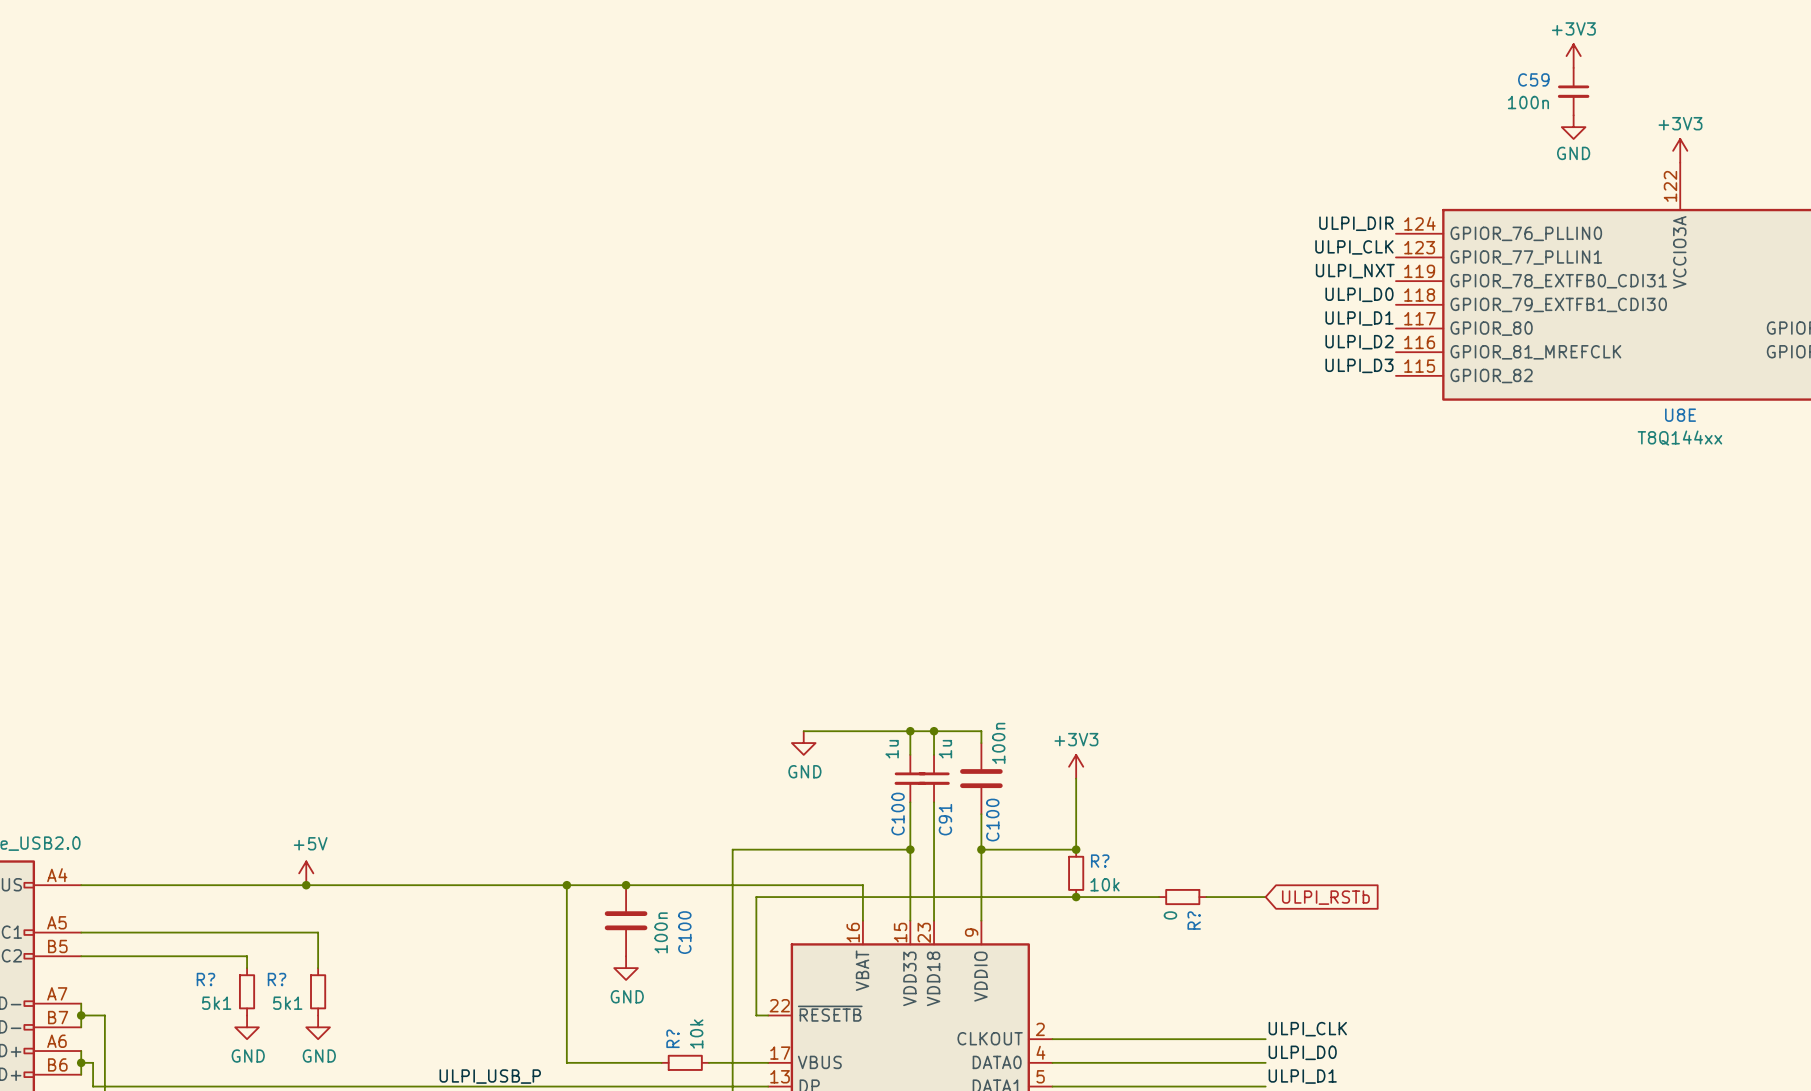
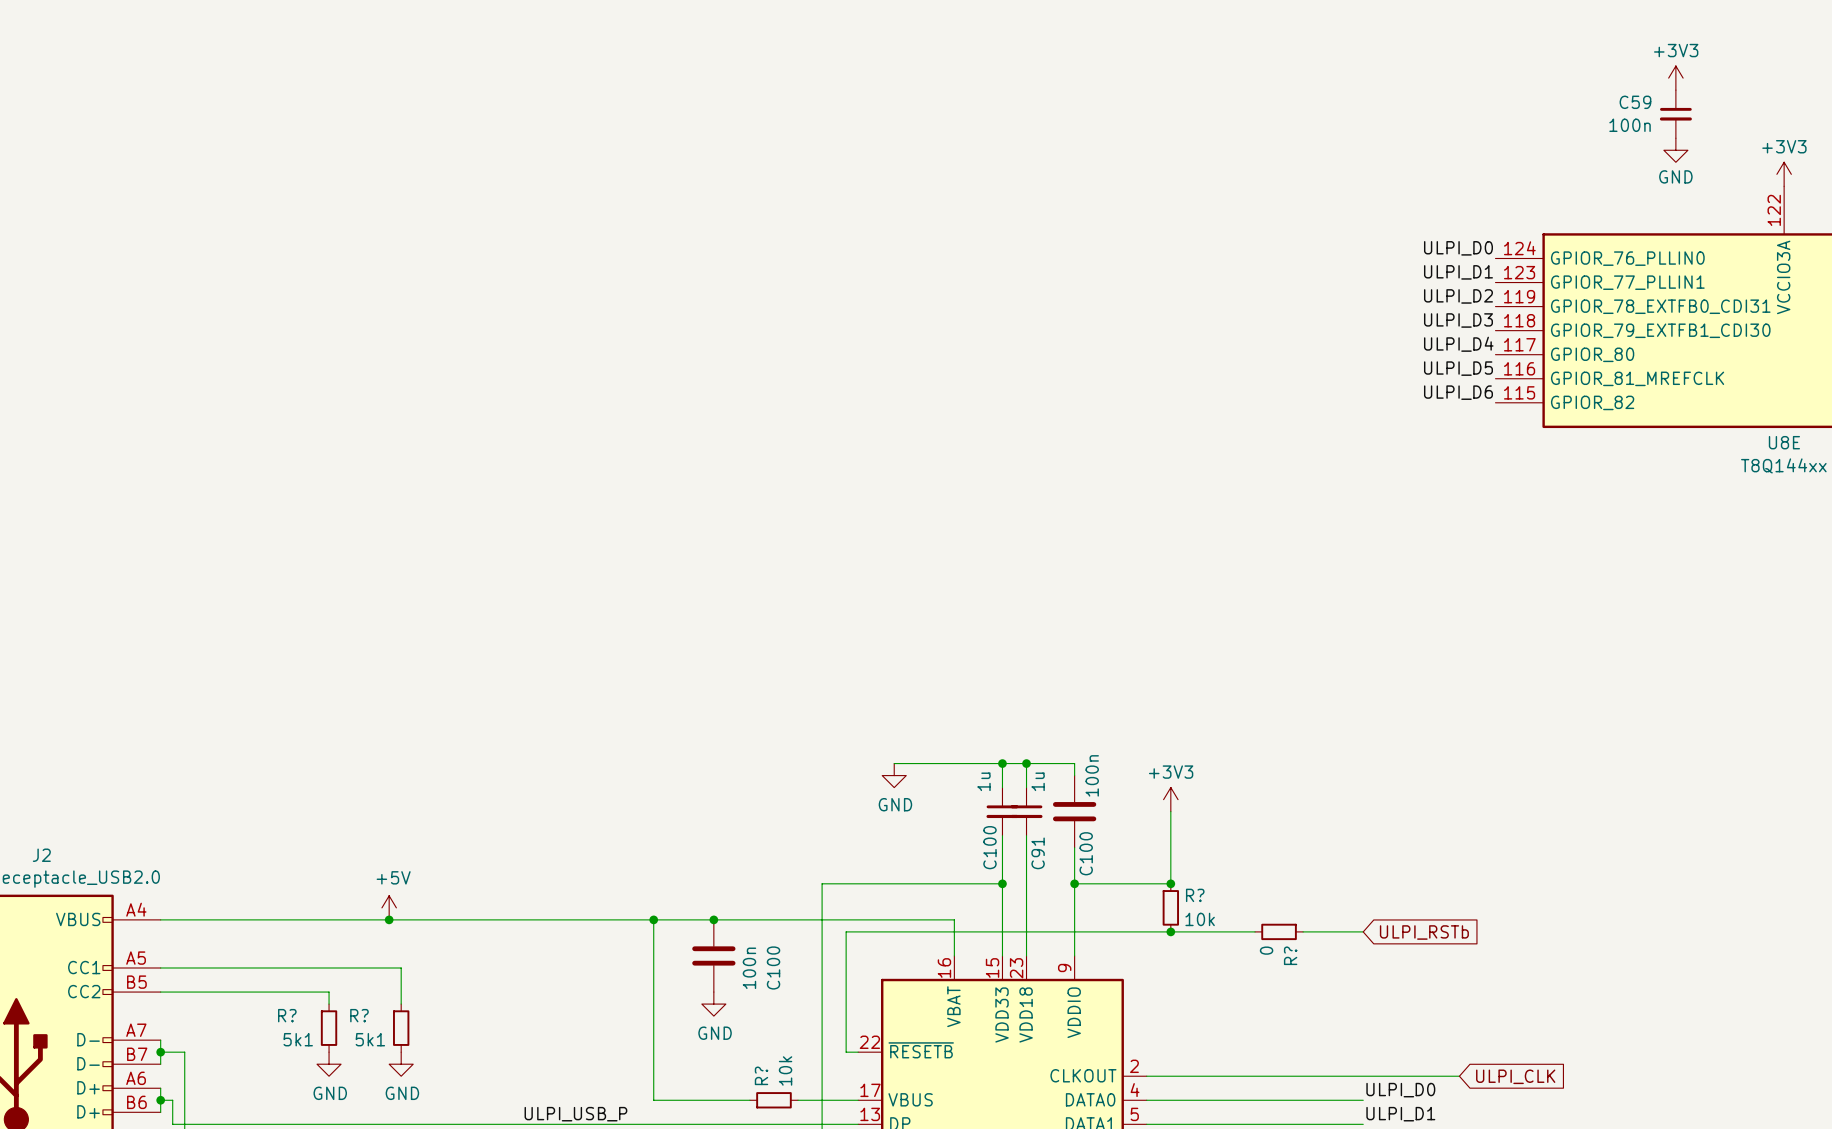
label: ULPI_DIR (1356, 223) -> ULPI_D0 (1458, 248)
label: ULPI_CLK (1354, 247) -> ULPI_D1 (1458, 272)
label: ULPI_NXT (1355, 271) -> ULPI_D2 (1458, 296)
label: ULPI_D0 (1359, 294) -> ULPI_D3 (1458, 320)
label: ULPI_D1 (1359, 318) -> ULPI_D4 (1458, 344)
label: ULPI_D2 (1359, 342) -> ULPI_D5 (1458, 368)
label: ULPI_D3 (1359, 365) -> ULPI_D6 (1458, 392)
label: ULPI_CLK (1307, 1029) -> none
wire: none -> (1363, 1076) (1459, 1076)
global label: none -> ULPI_CLK (1515, 1076)

